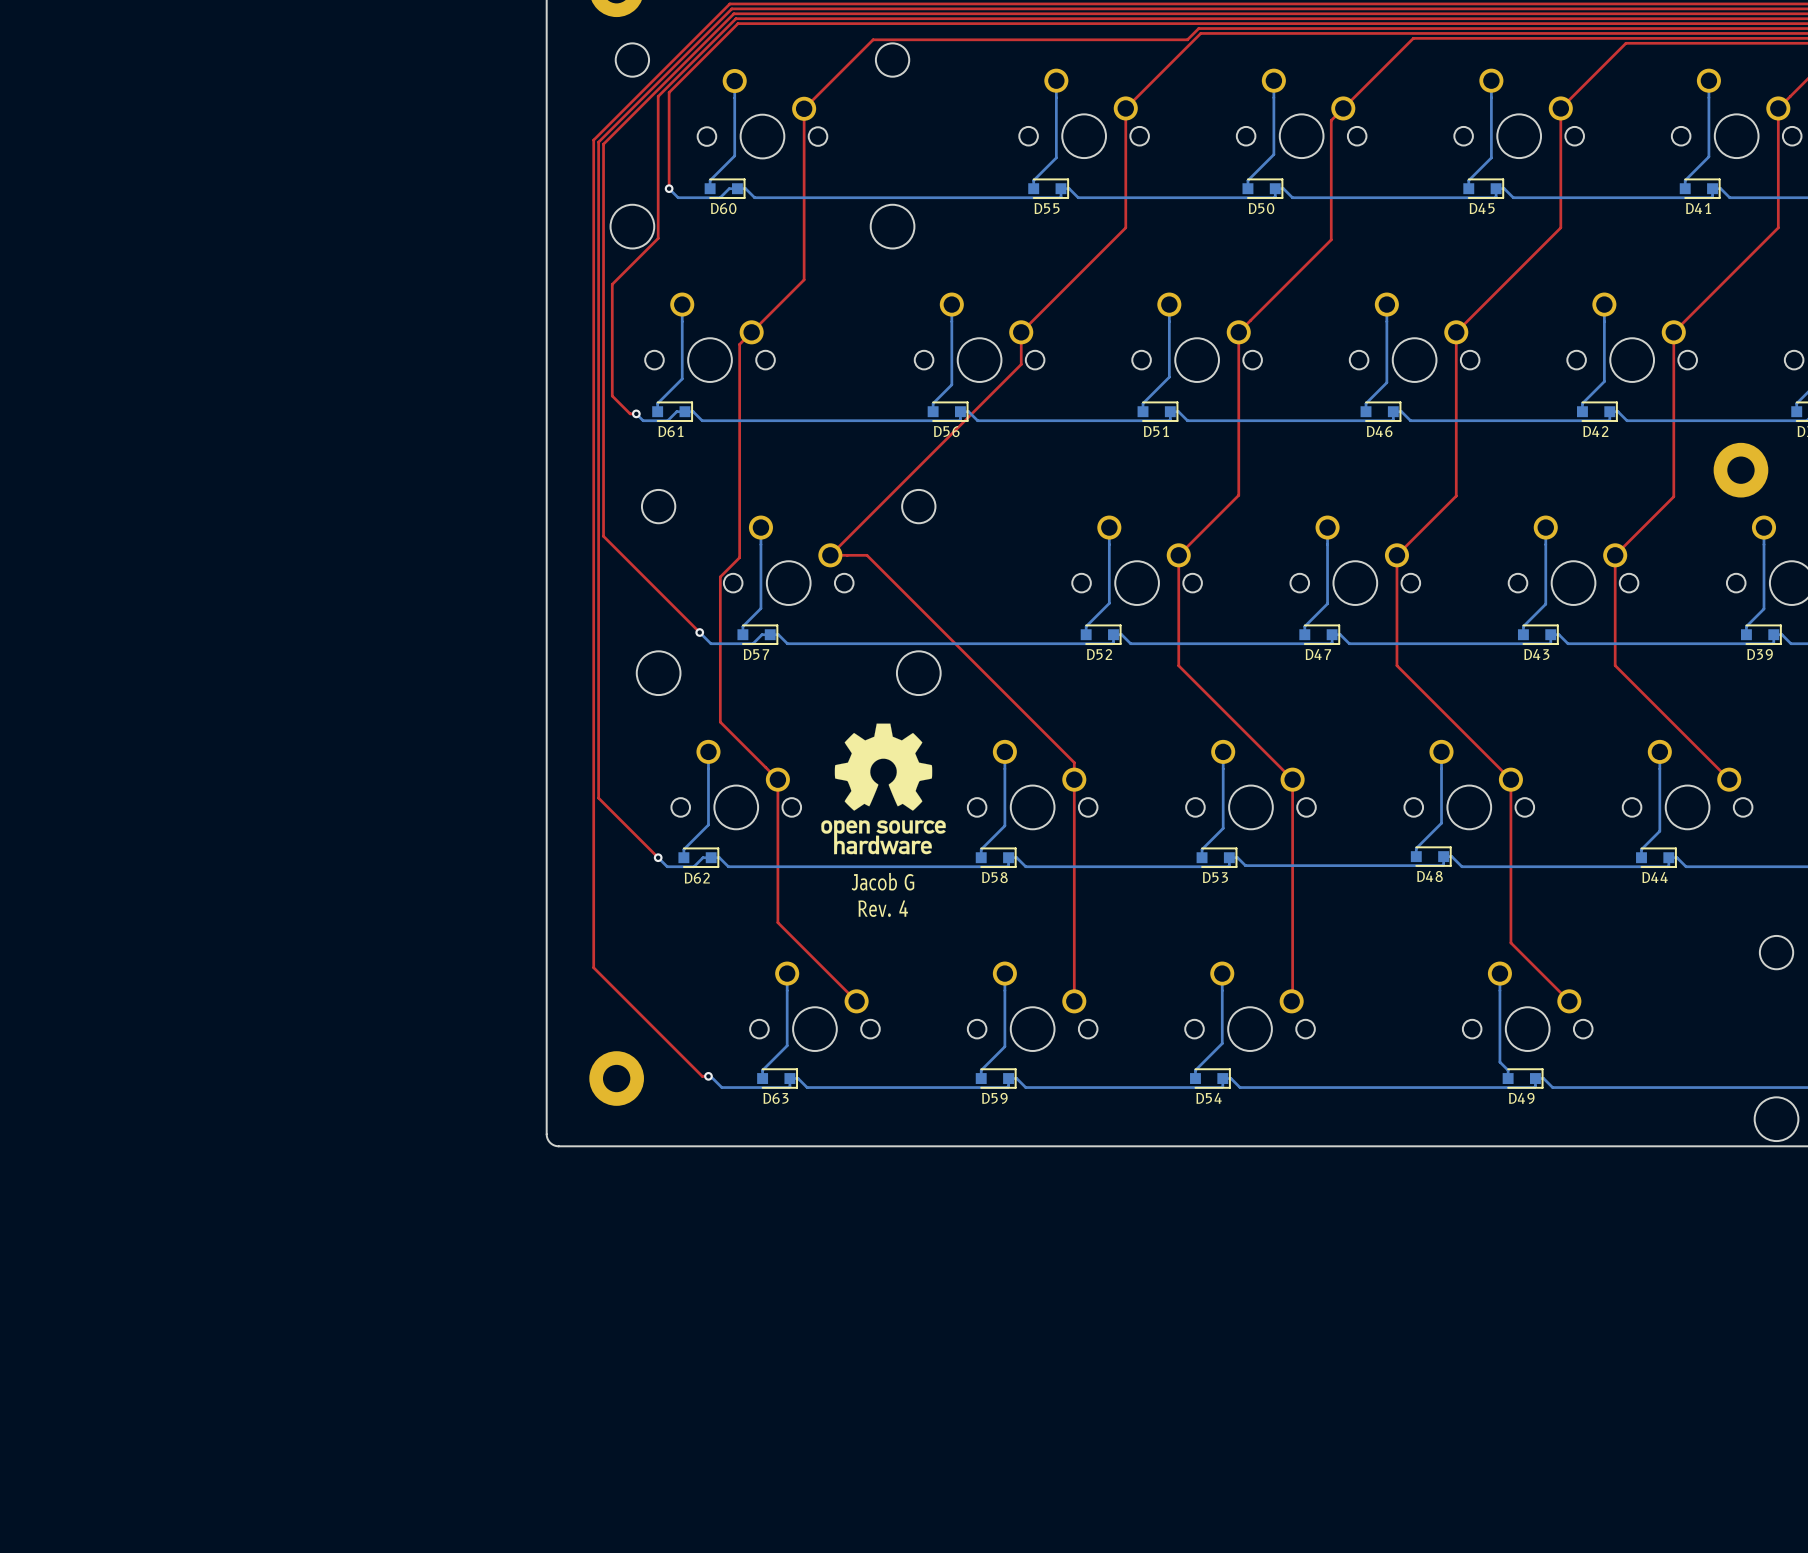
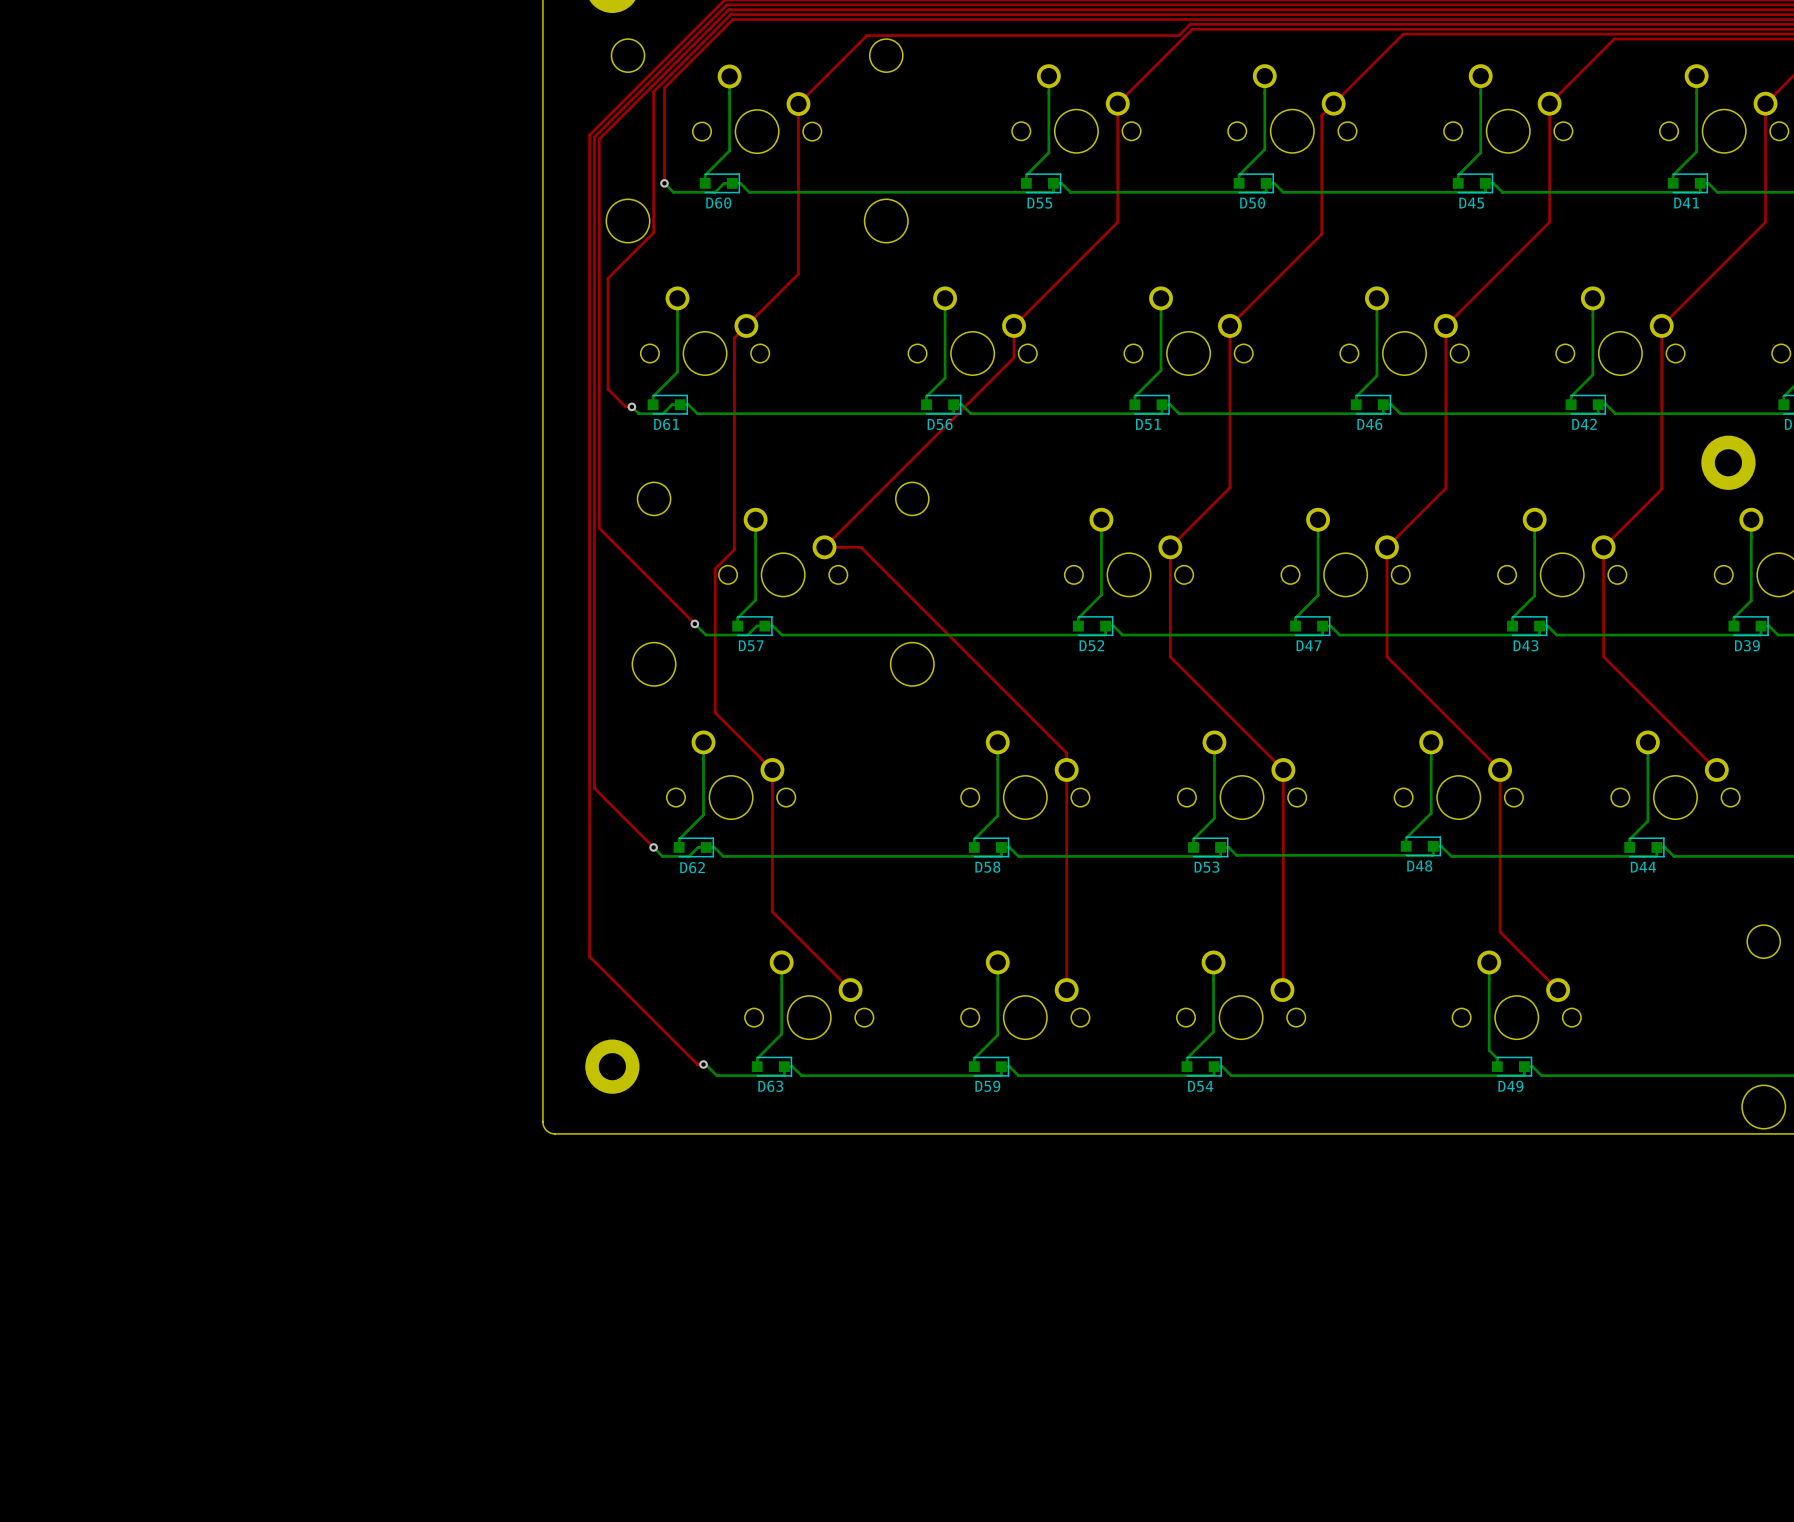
drawing: [821, 723, 946, 855] -> none
text: Jacob G (882, 881) -> none
text: Rev. 4 (883, 908) -> none

